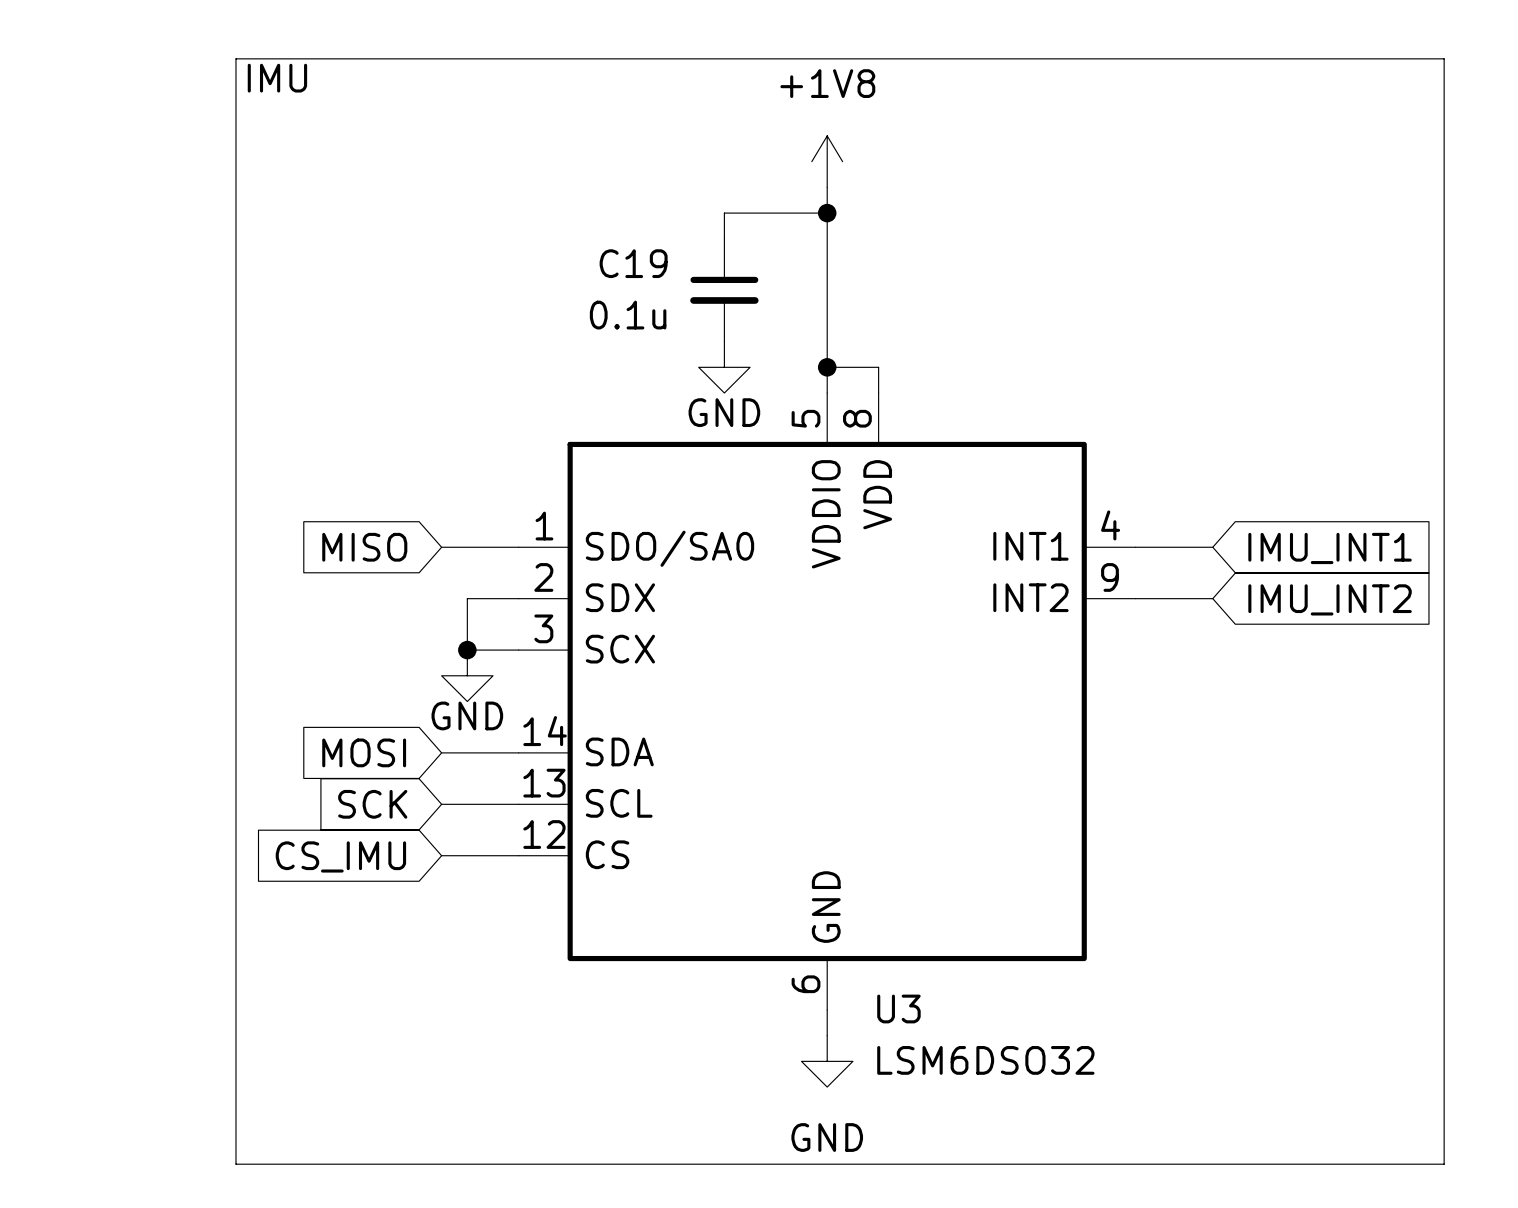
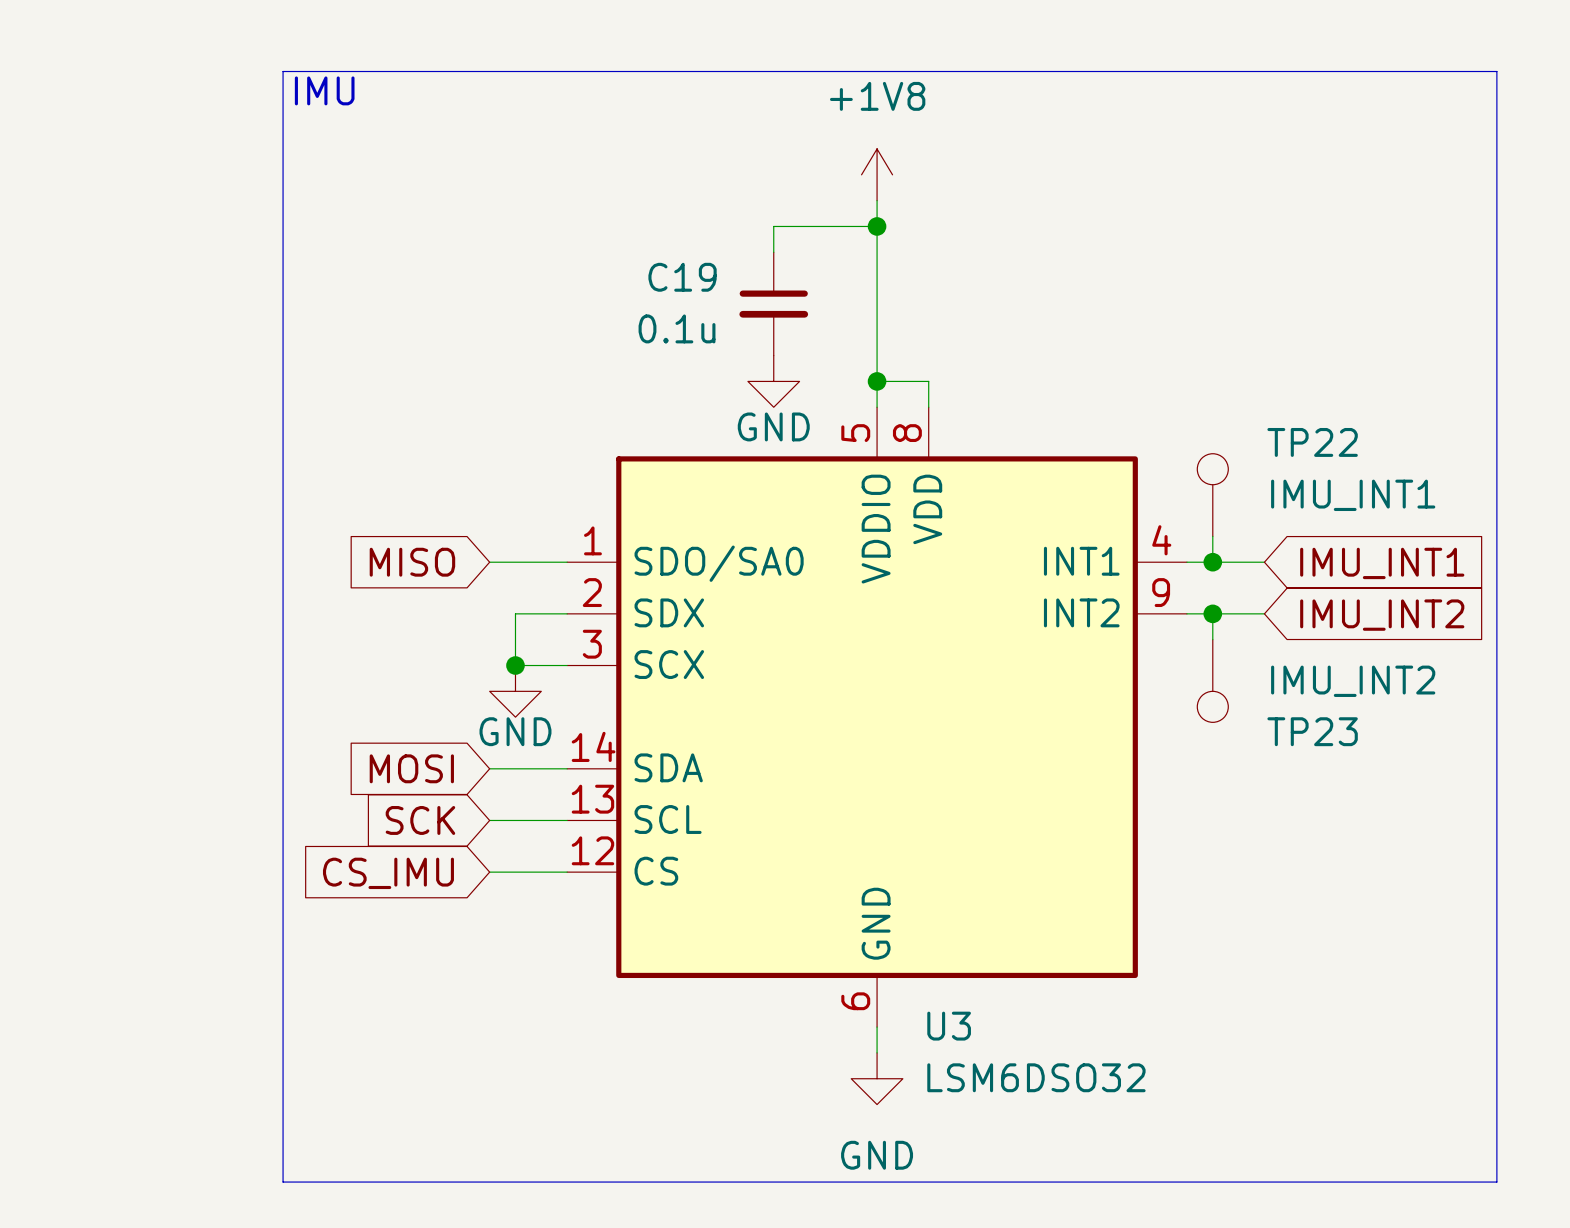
TP22: none -> IMU_INT1 (1212, 495)
wire: none -> (1212, 536) (1212, 562)
junction: none -> (1212, 562)
wire: none -> (1212, 613) (1212, 639)
junction: none -> (1212, 613)
TP23: none -> IMU_INT2 (1212, 681)

